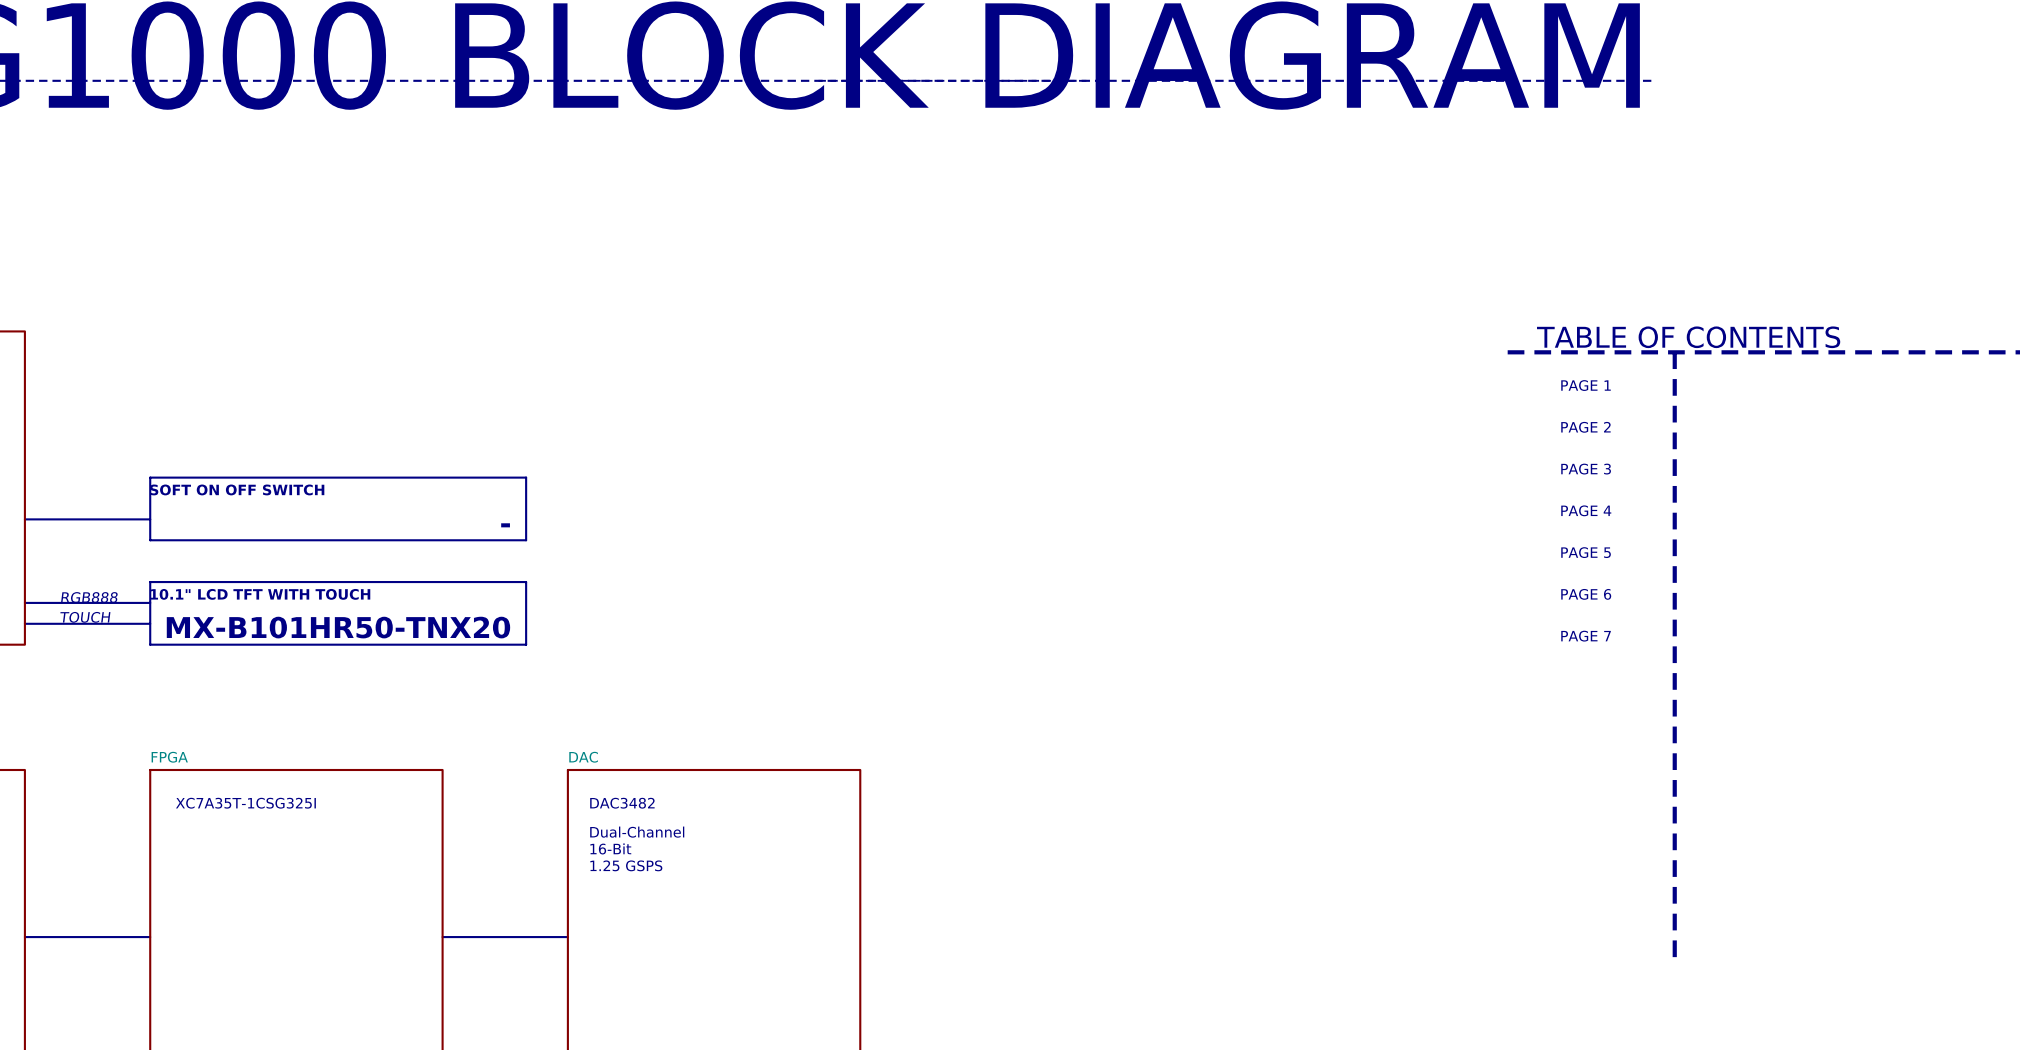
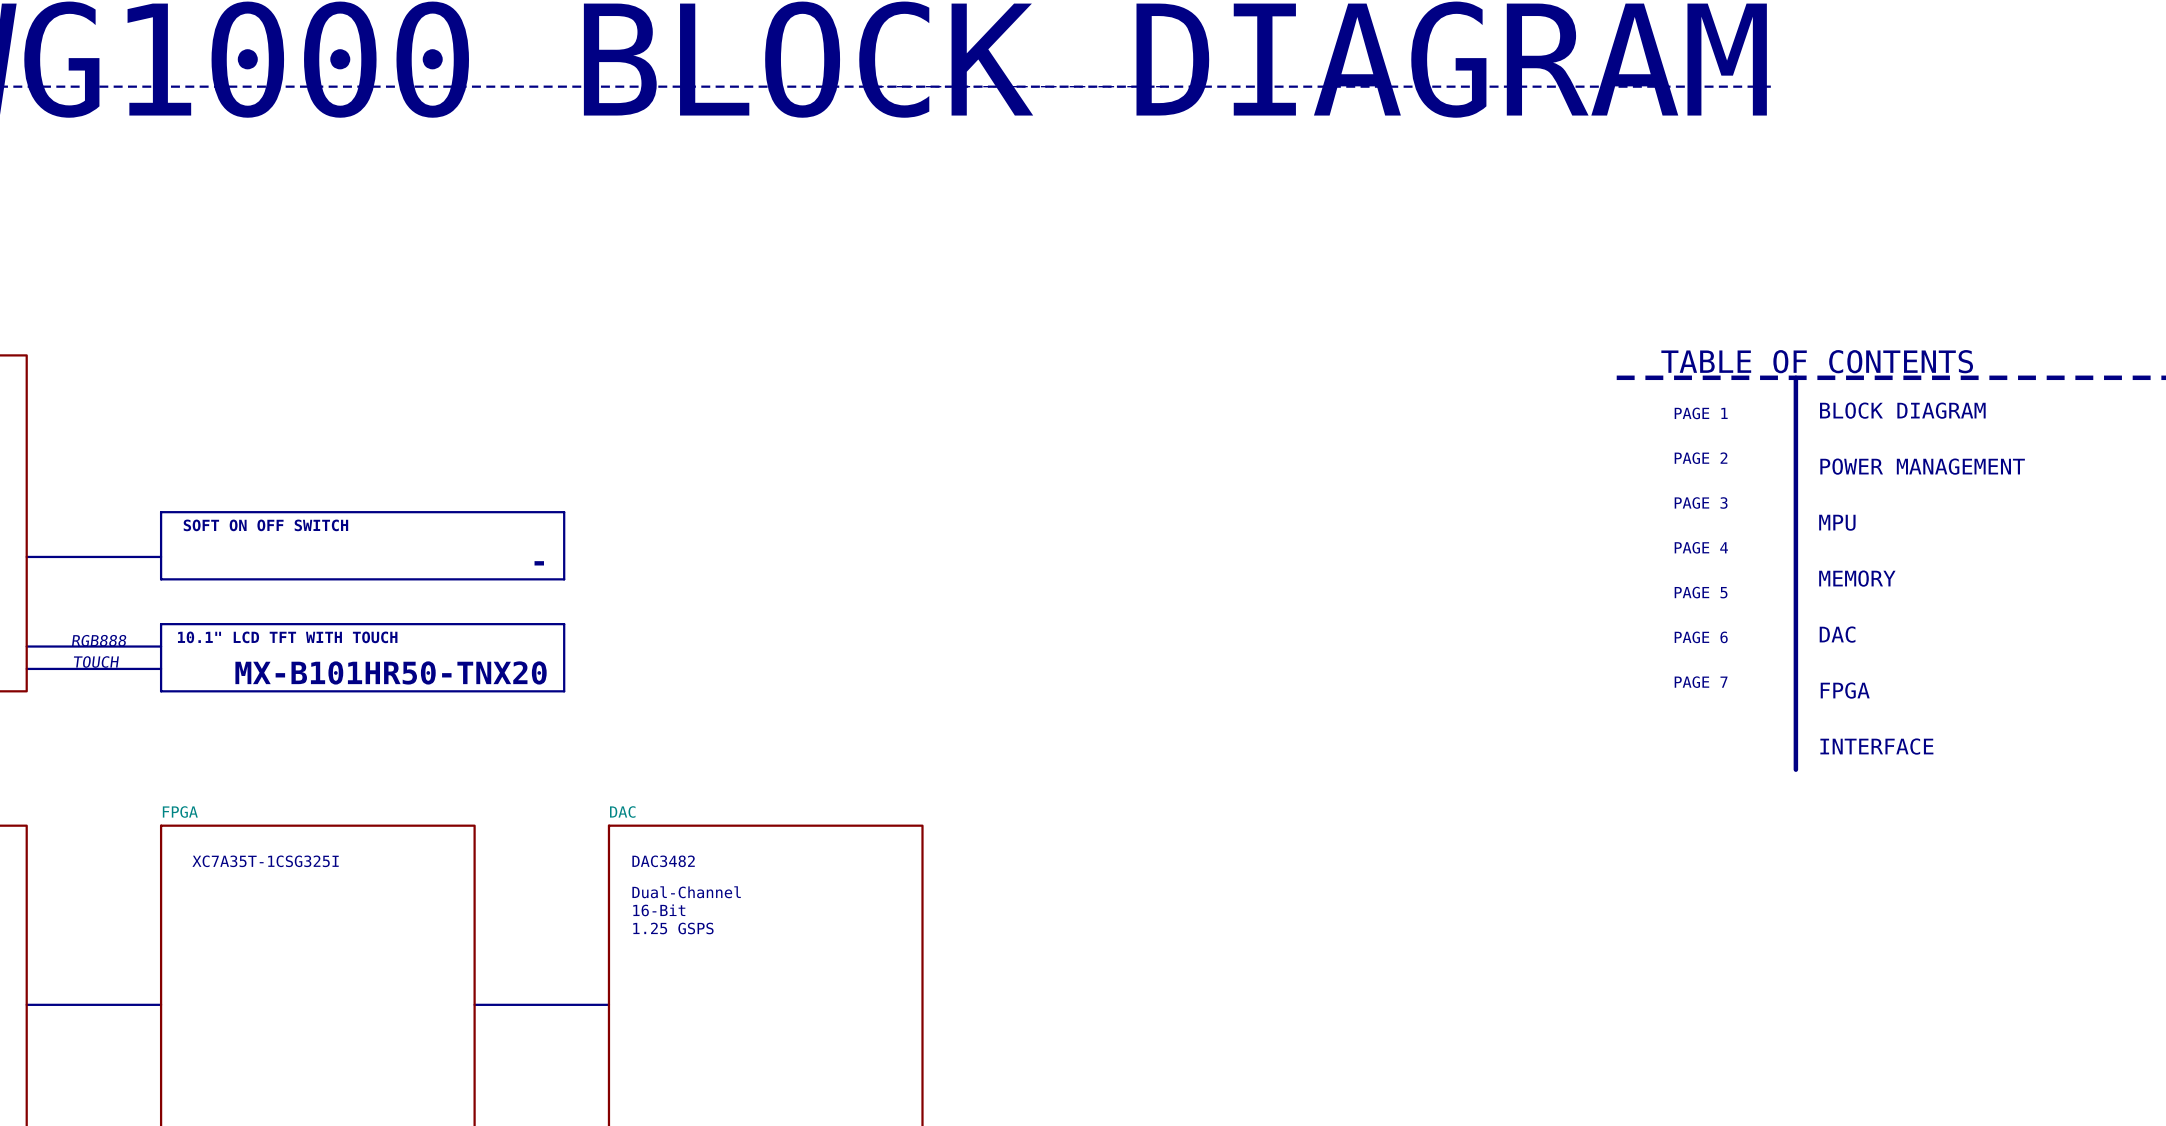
line: (1674, 352) (1674, 957) -> (1795, 377) (1795, 769)
text: none -> BLOCK DIAGRAM (1902, 410)
text: none -> POWER MANAGEMENT (1922, 466)
text: none -> MPU (1837, 522)
text: none -> MEMORY (1857, 578)
text: none -> DAC (1837, 634)
text: none -> FPGA (1845, 690)
text: none -> INTERFACE (1876, 746)

